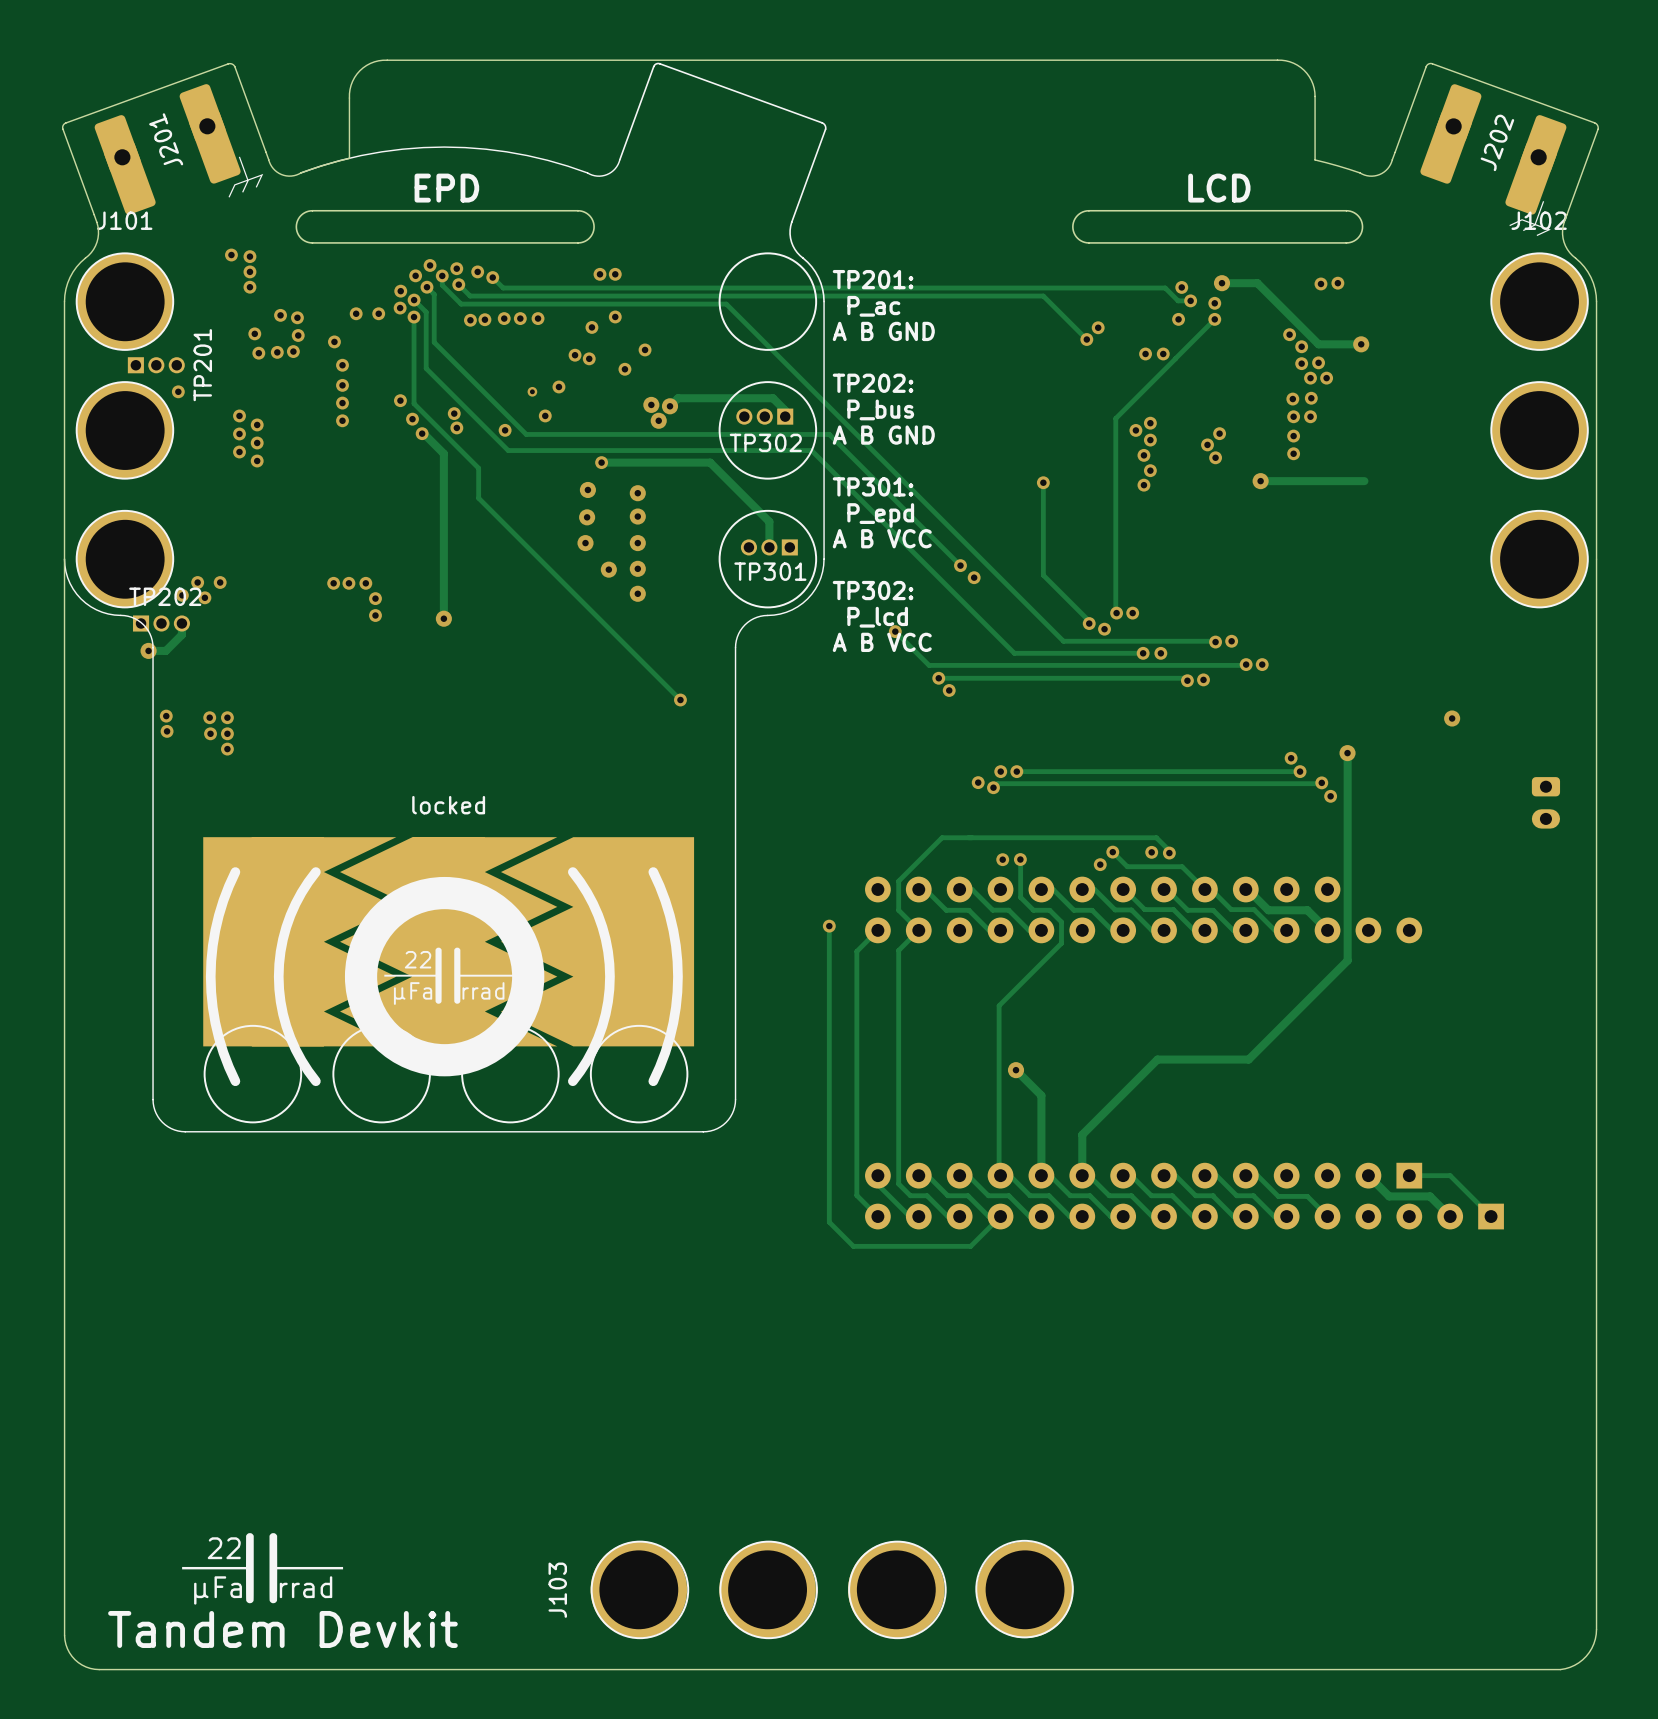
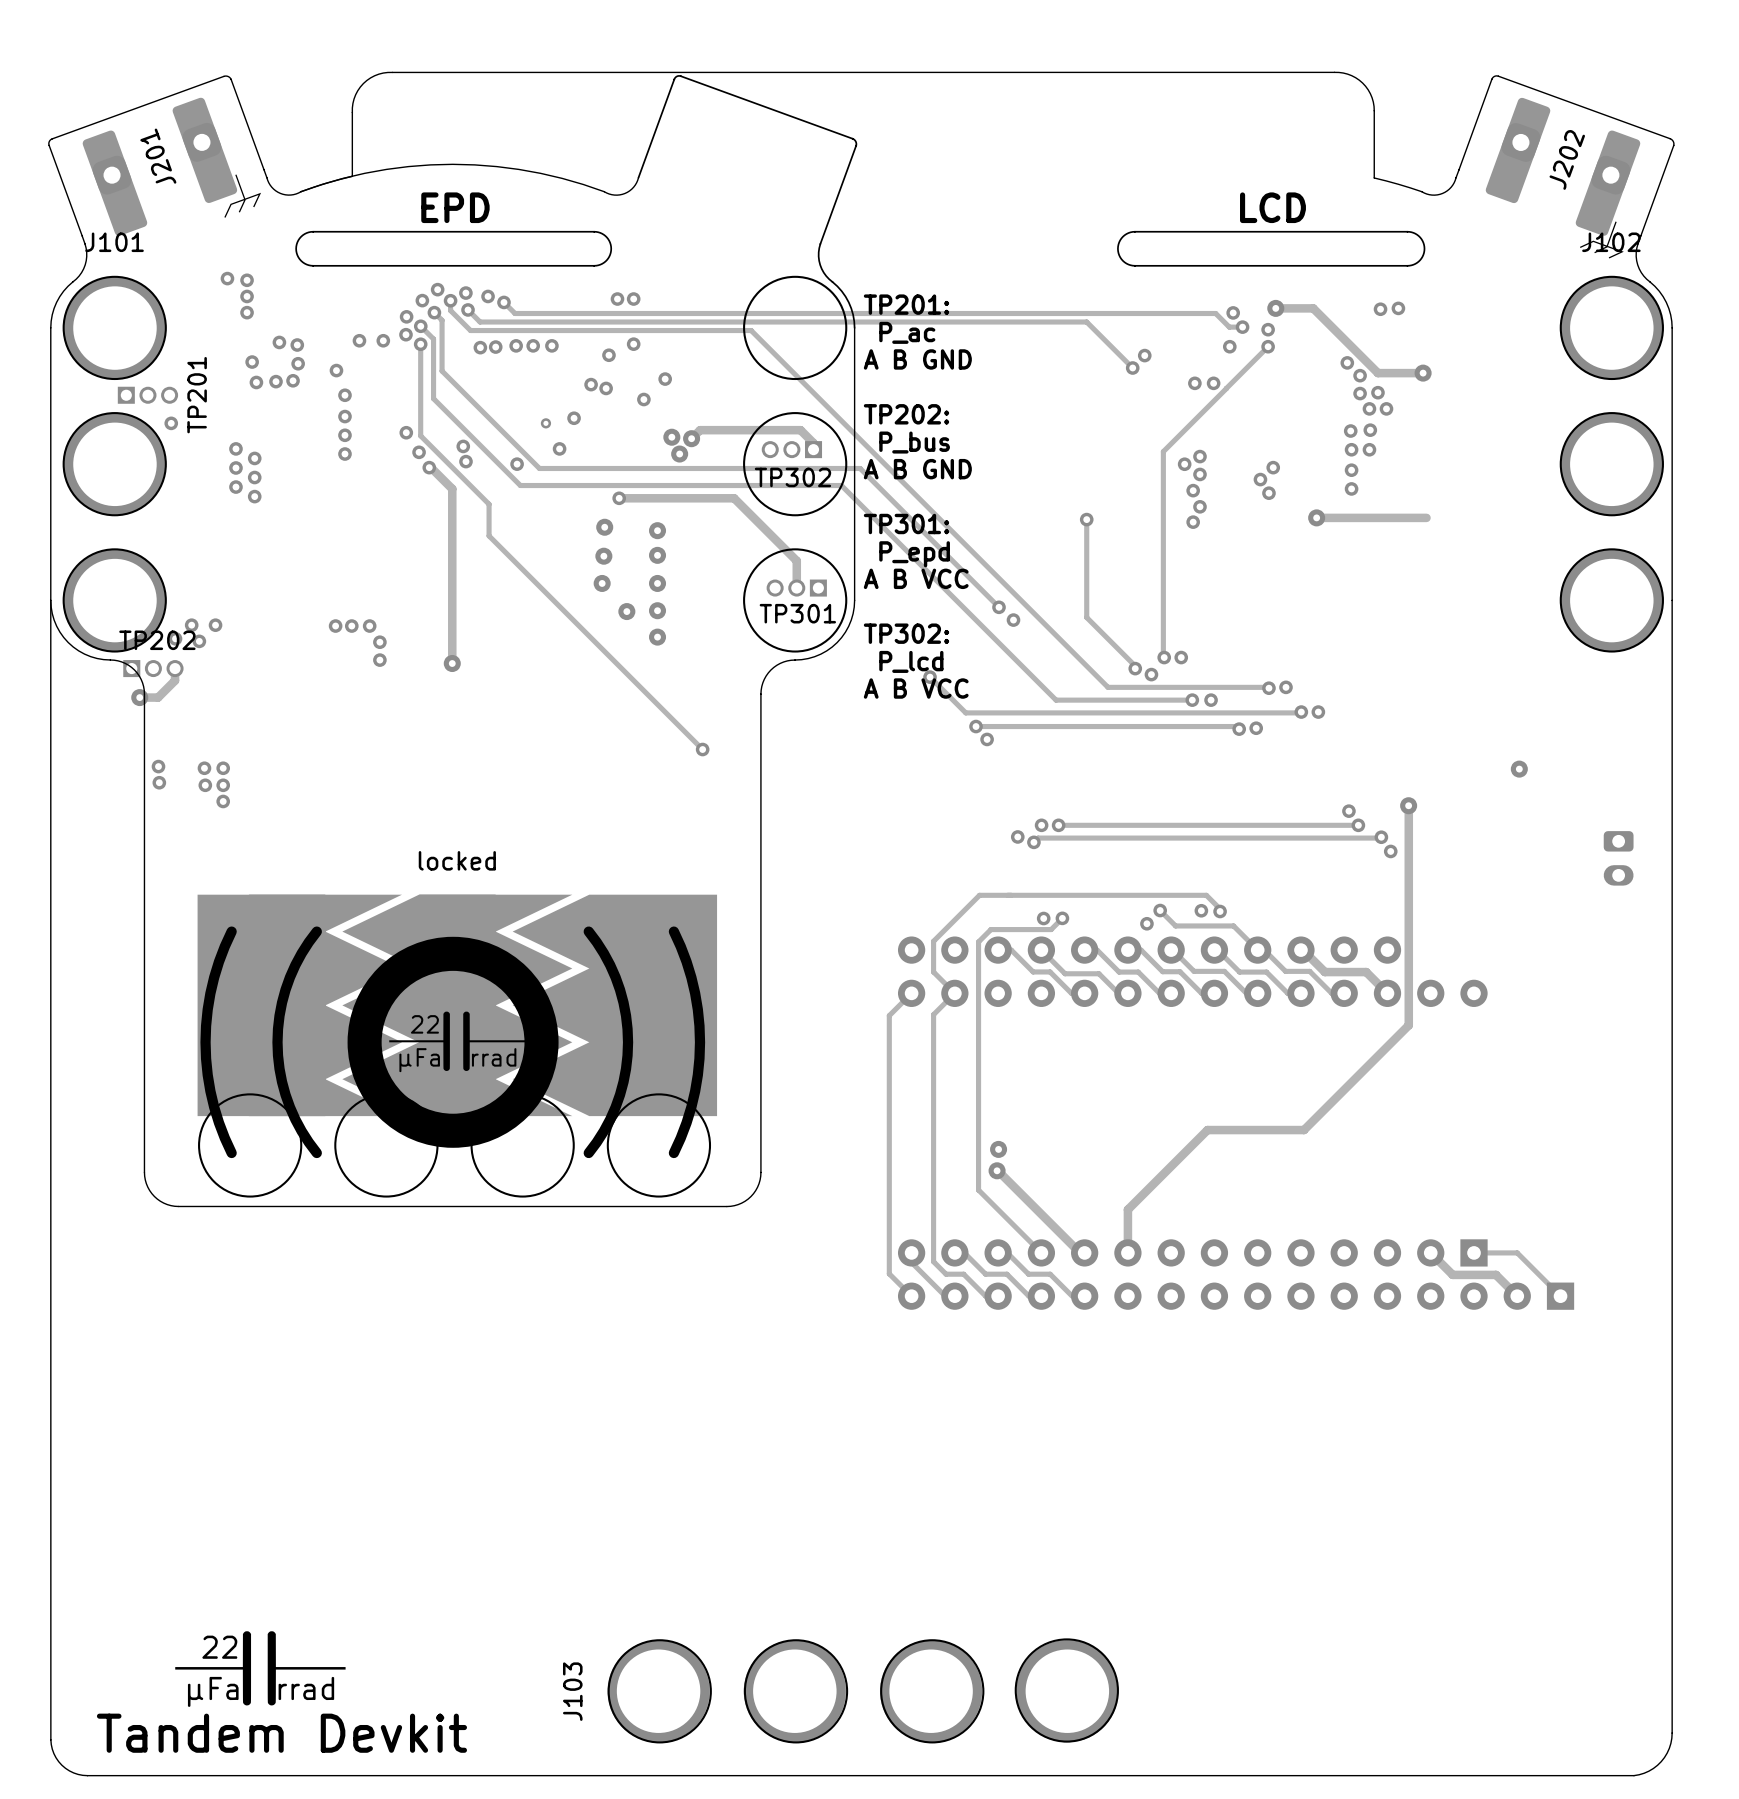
track: (1020, 859) (1020, 897) (1033, 910) (1049, 910) (1061, 922) (1061, 943) (999, 1005) (999, 1174) -> (1062, 918) (1051, 929) (990, 929) (978, 941) (978, 1190) (1039, 1251)
track: (918, 889) (925, 889) (946, 910) (968, 910) (989, 930) (1000, 930) -> none
track: none -> (1041, 950) (1065, 973) (1098, 973) (1118, 993) (1127, 993)
track: (829, 926) (829, 1222) (853, 1246) (970, 1246) (1000, 1216) -> none
via: (829, 926) -> none
track: (1016, 1070) (1041, 1095) (1041, 1175) (1050, 1175) (1070, 1195) (1089, 1195) (1110, 1216) (1123, 1216) -> none
via: (1016, 1070) -> none
via: none -> (998, 1149)
track: none -> (997, 1170) (1080, 1252)
via: none -> (997, 1170)
track: (1009, 1175) (1030, 1195) (1049, 1195) (1069, 1216) (1082, 1216) -> none
track: (1082, 1175) (1089, 1175) (1109, 1195) (1131, 1195) (1152, 1216) (1164, 1216) -> none
track: (1123, 1175) (1131, 1175) (1151, 1195) (1172, 1195) (1193, 1216) (1204, 1216) -> none
track: (1164, 1175) (1175, 1175) (1195, 1195) (1213, 1195) (1233, 1216) (1245, 1216) -> none
track: (1204, 1175) (1216, 1175) (1236, 1195) (1253, 1195) (1274, 1216) (1286, 1216) -> none
track: (1245, 1175) (1257, 1175) (1278, 1196) (1307, 1196) (1327, 1216) -> none

